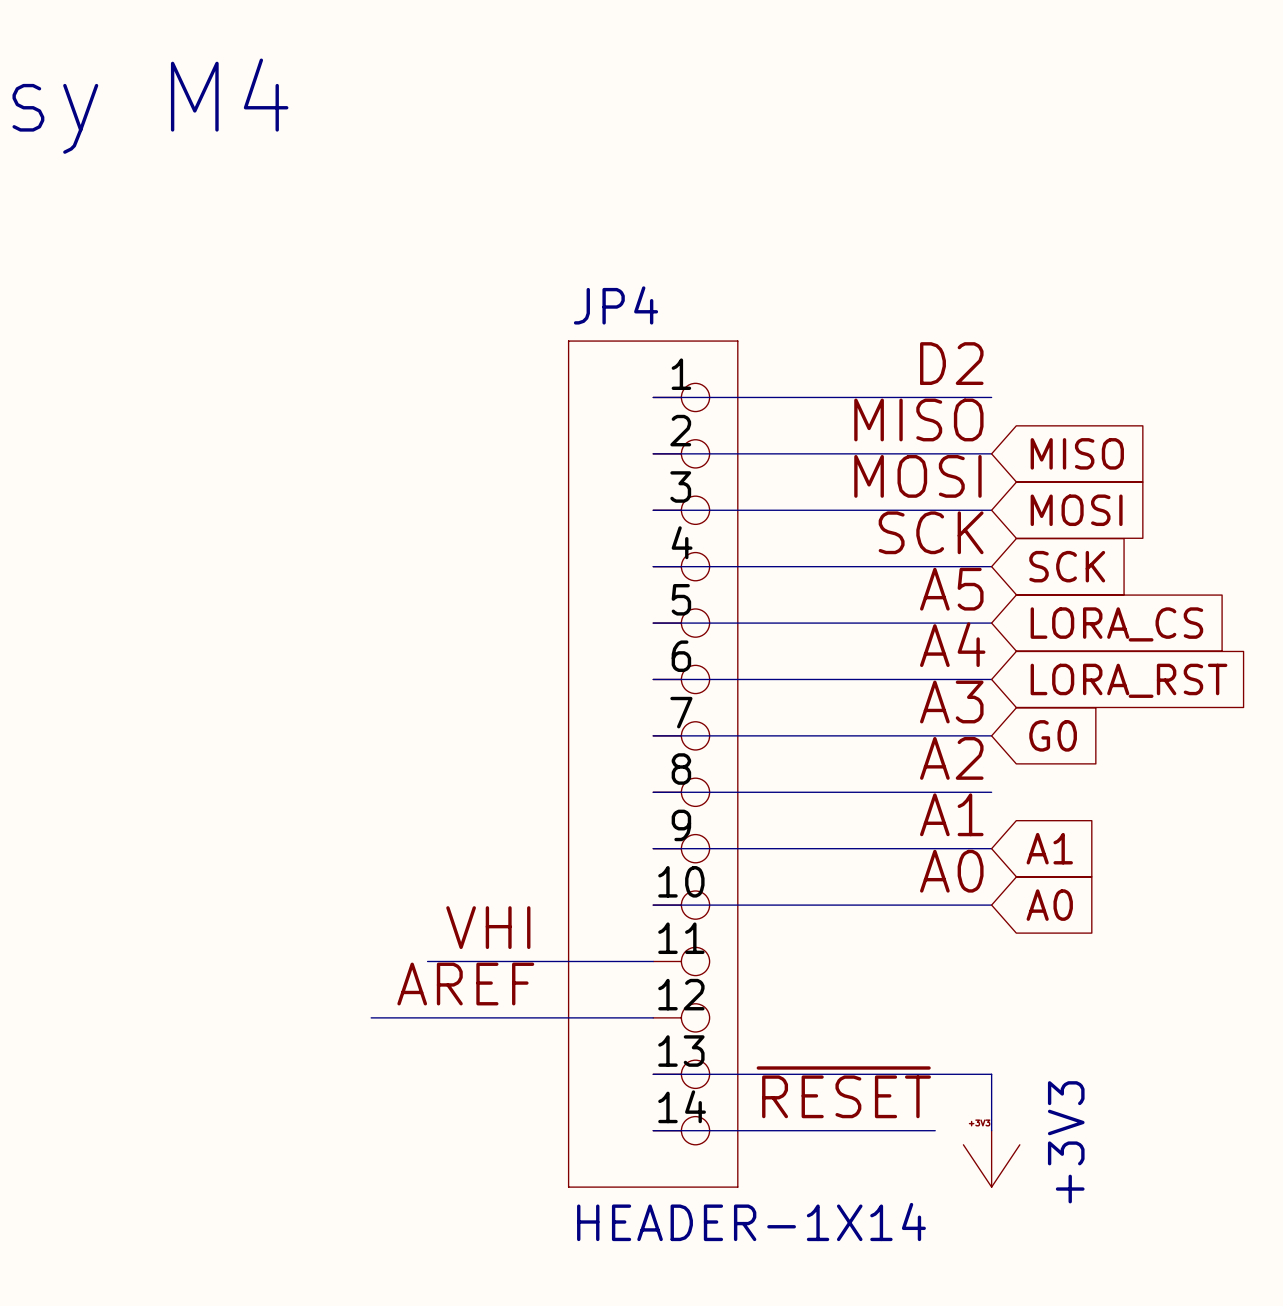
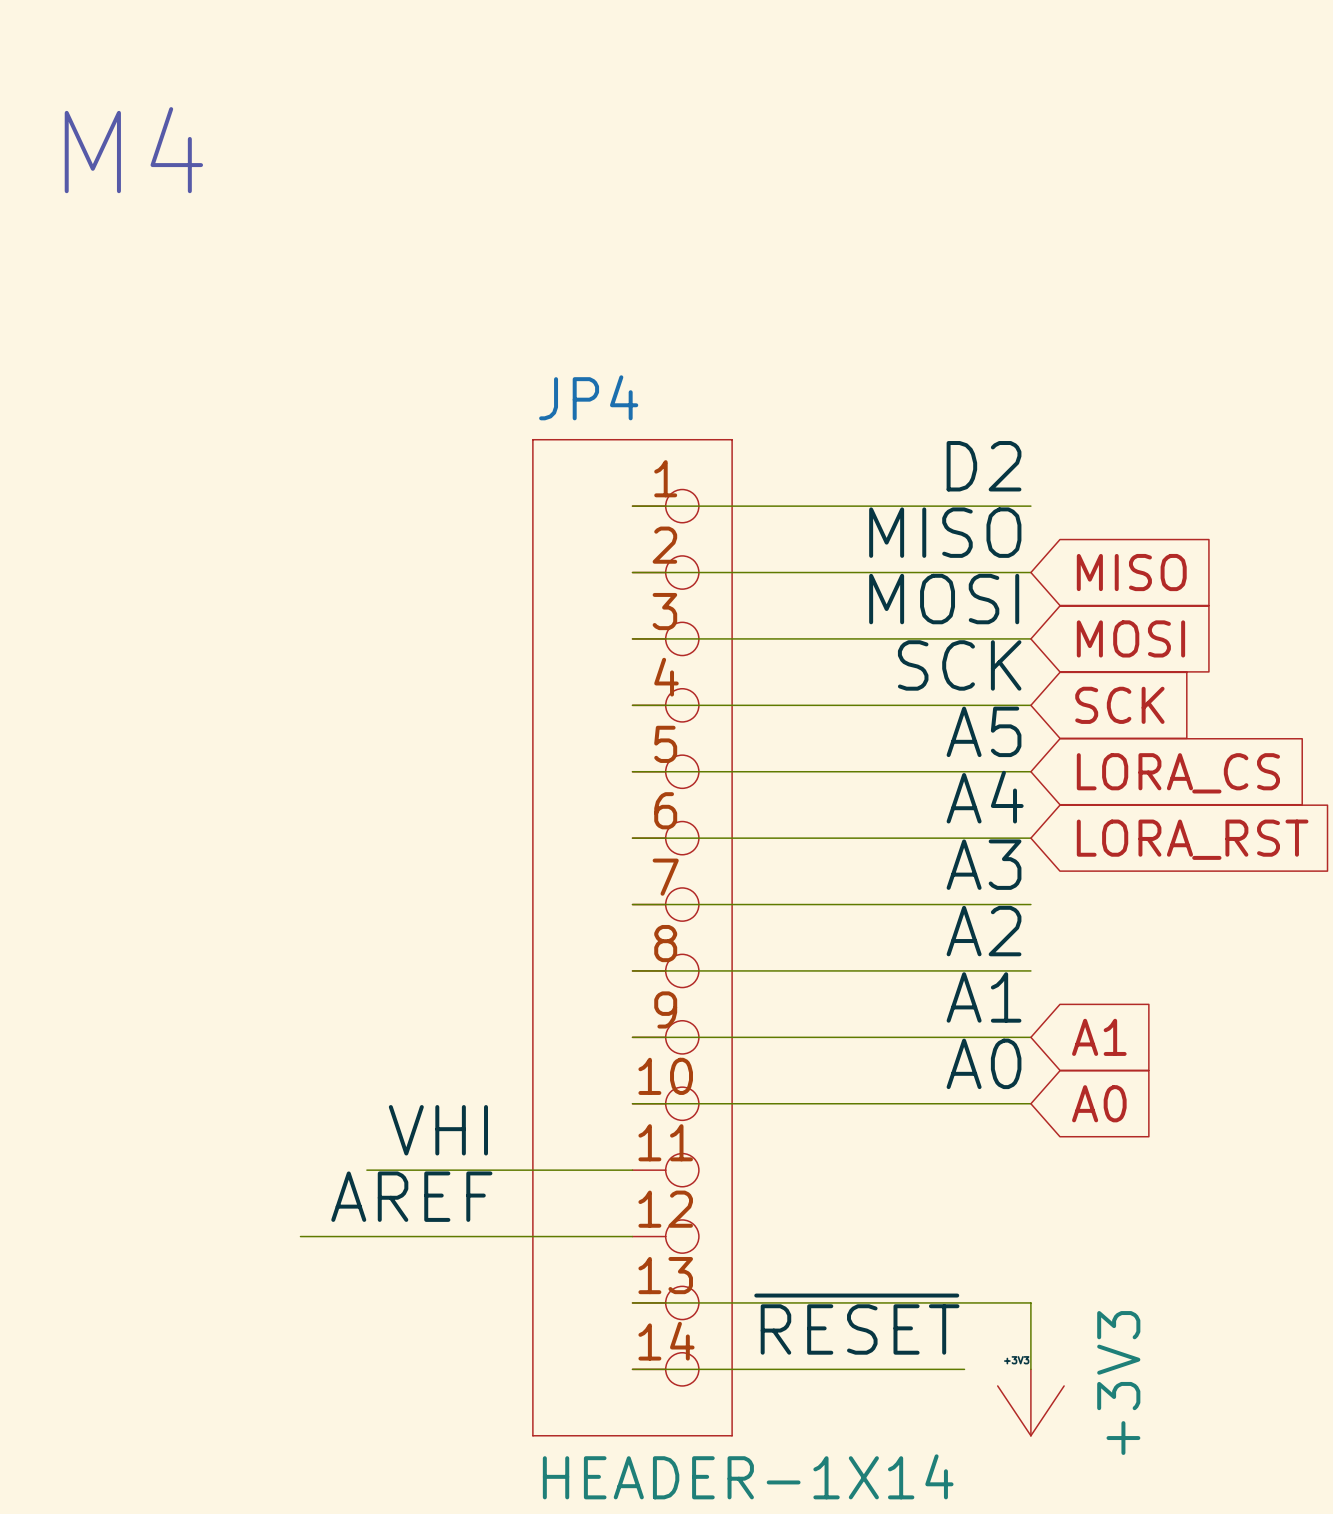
global label: G0 (1053, 735) -> none

